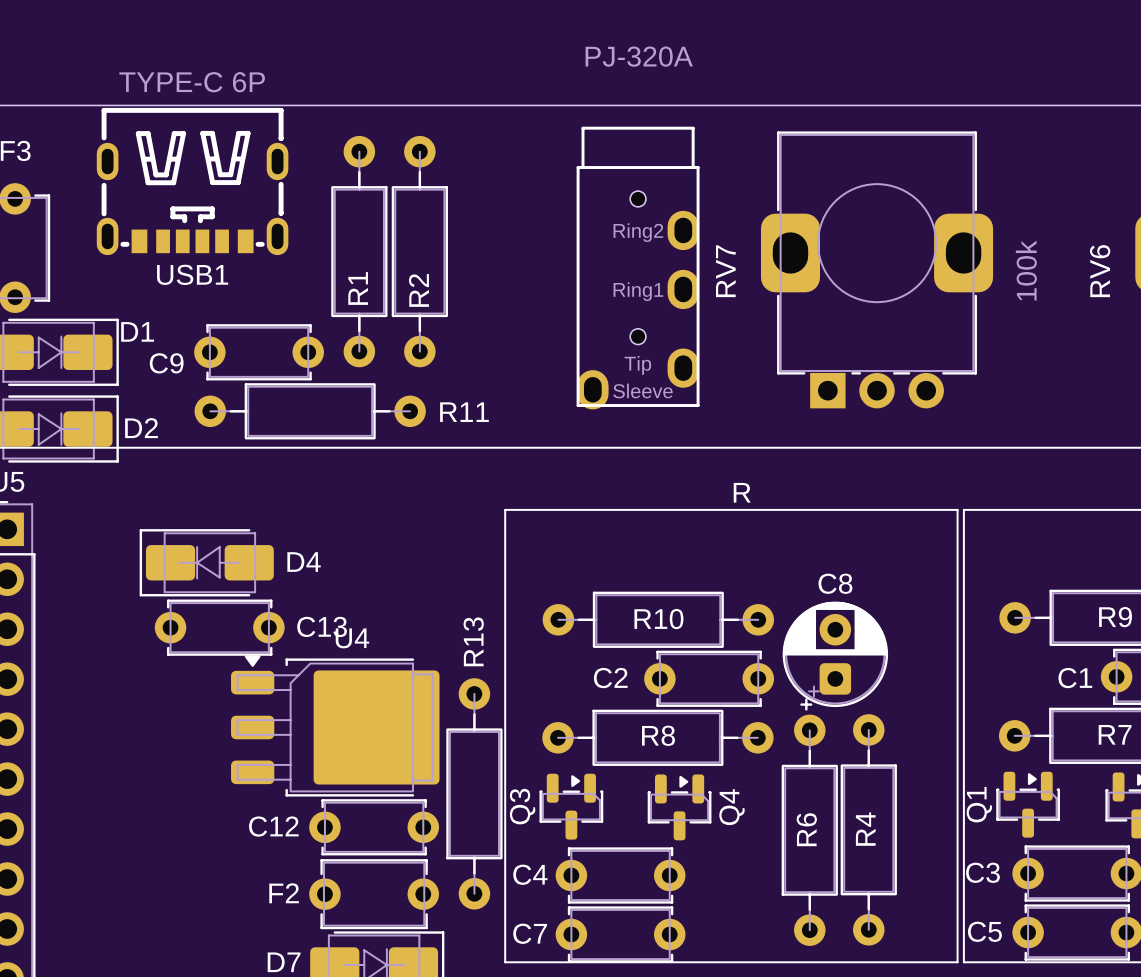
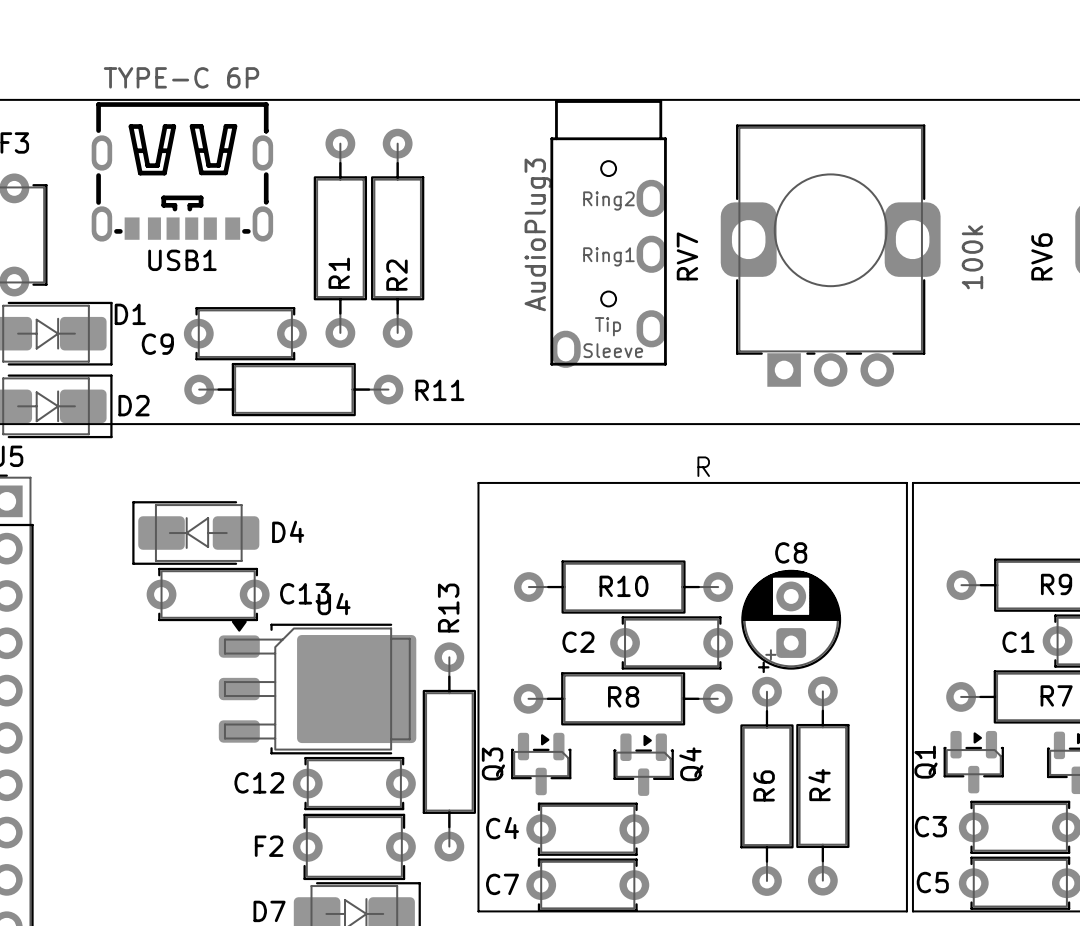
part: none -> AudioPlug3 (608, 234)
part: PJ-320A (638, 268) -> none

